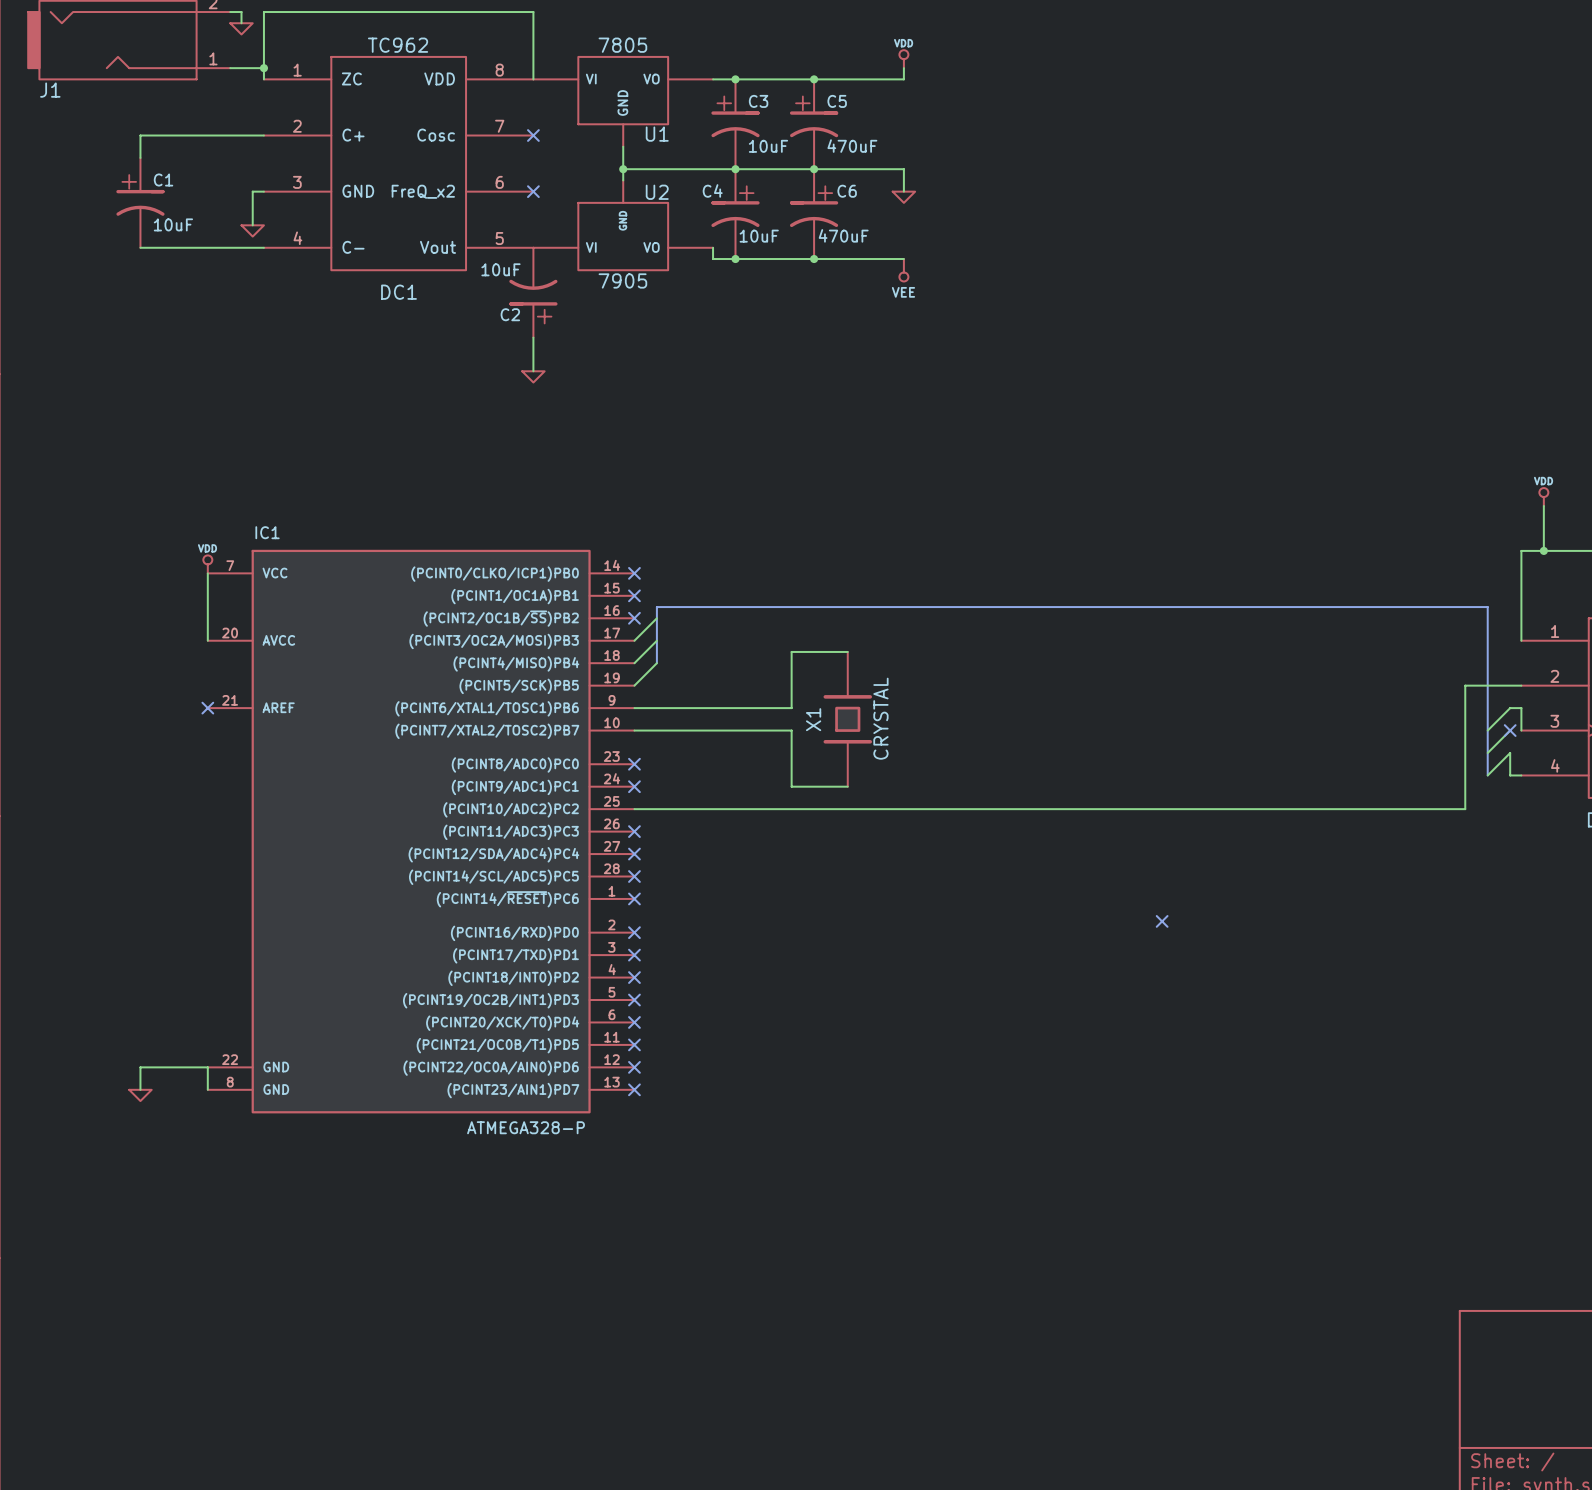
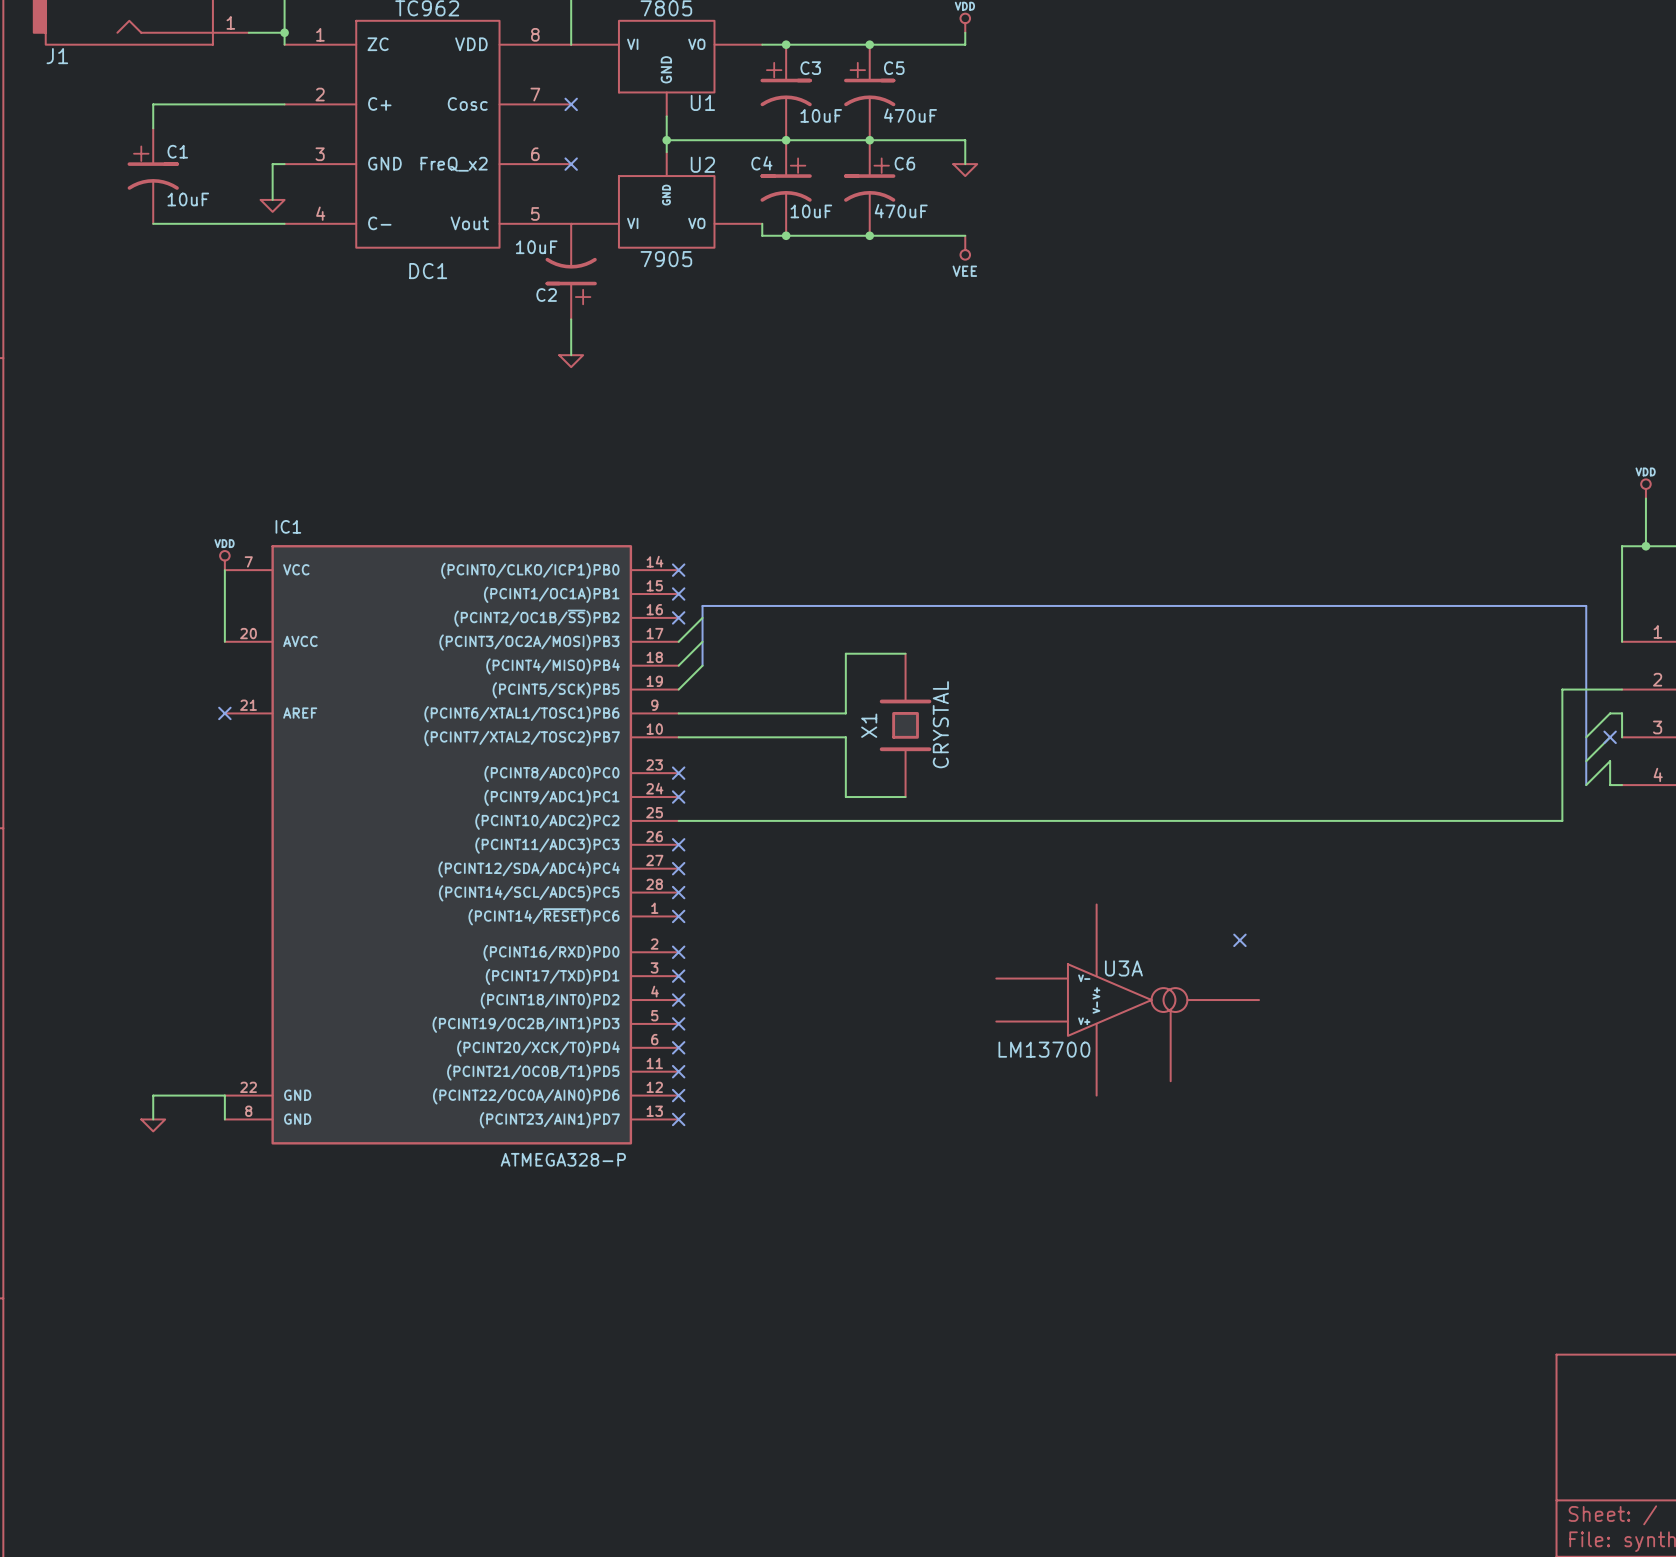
U3A: none -> LM13700 (1127, 1000)

